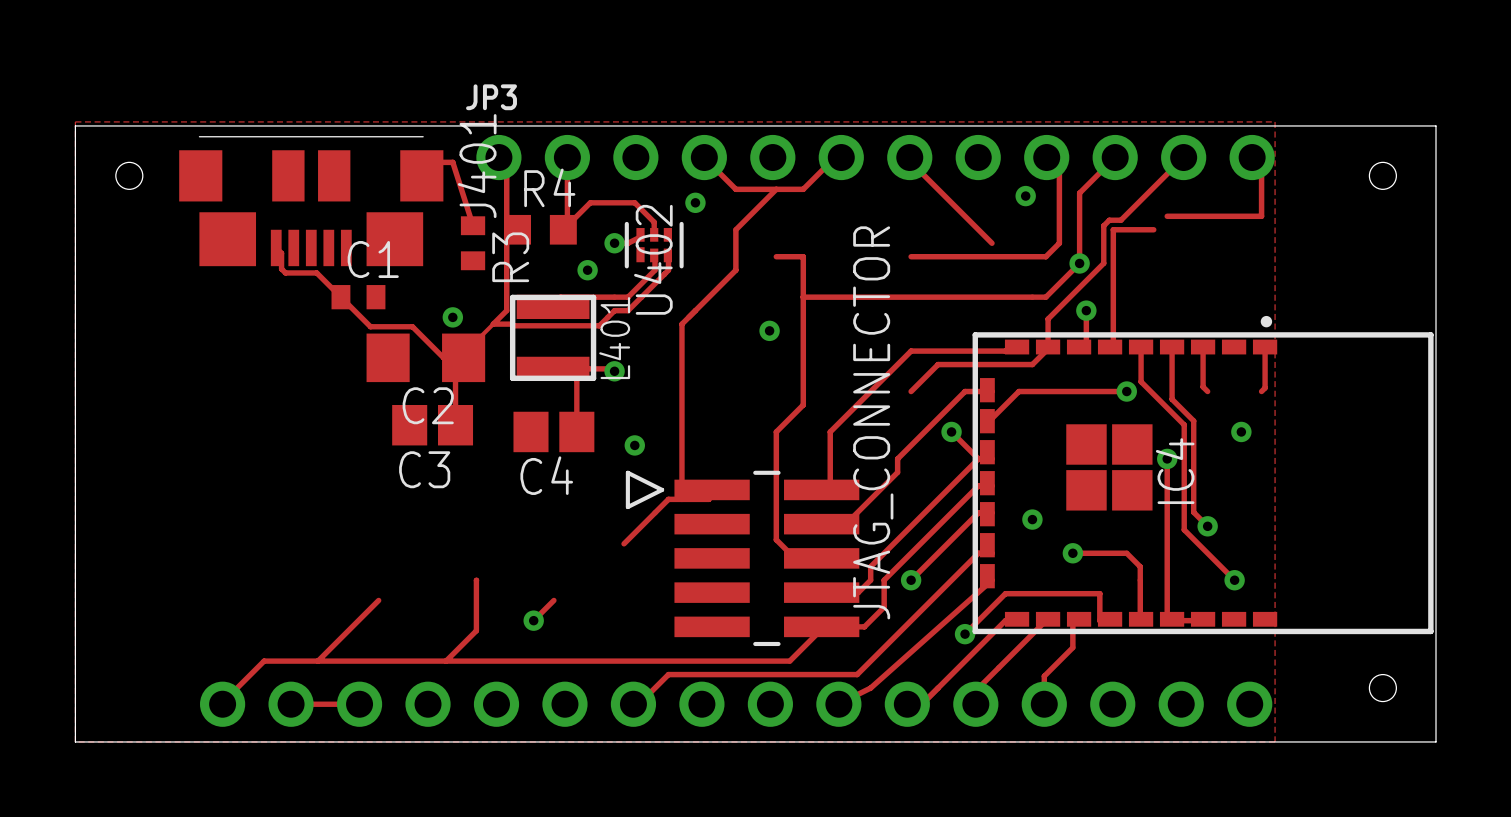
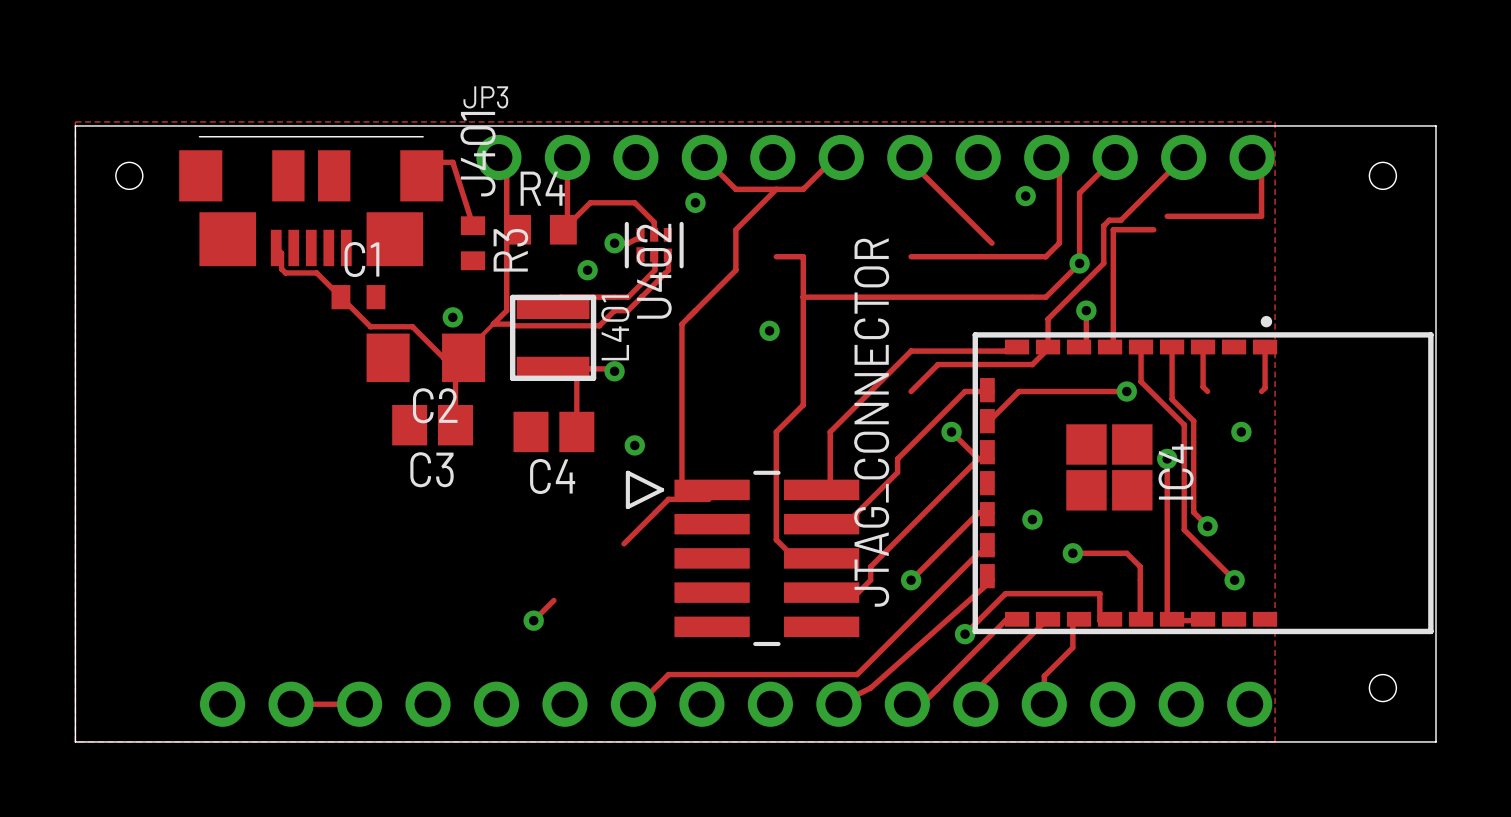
track: (987, 483) (991, 485) (978, 485) (884, 580) (884, 607) (864, 626) (821, 626) (789, 661) (264, 661) (222, 704) -> none
track: (476, 580) (476, 630) (446, 661) -> none
track: (378, 600) (318, 661) -> none

